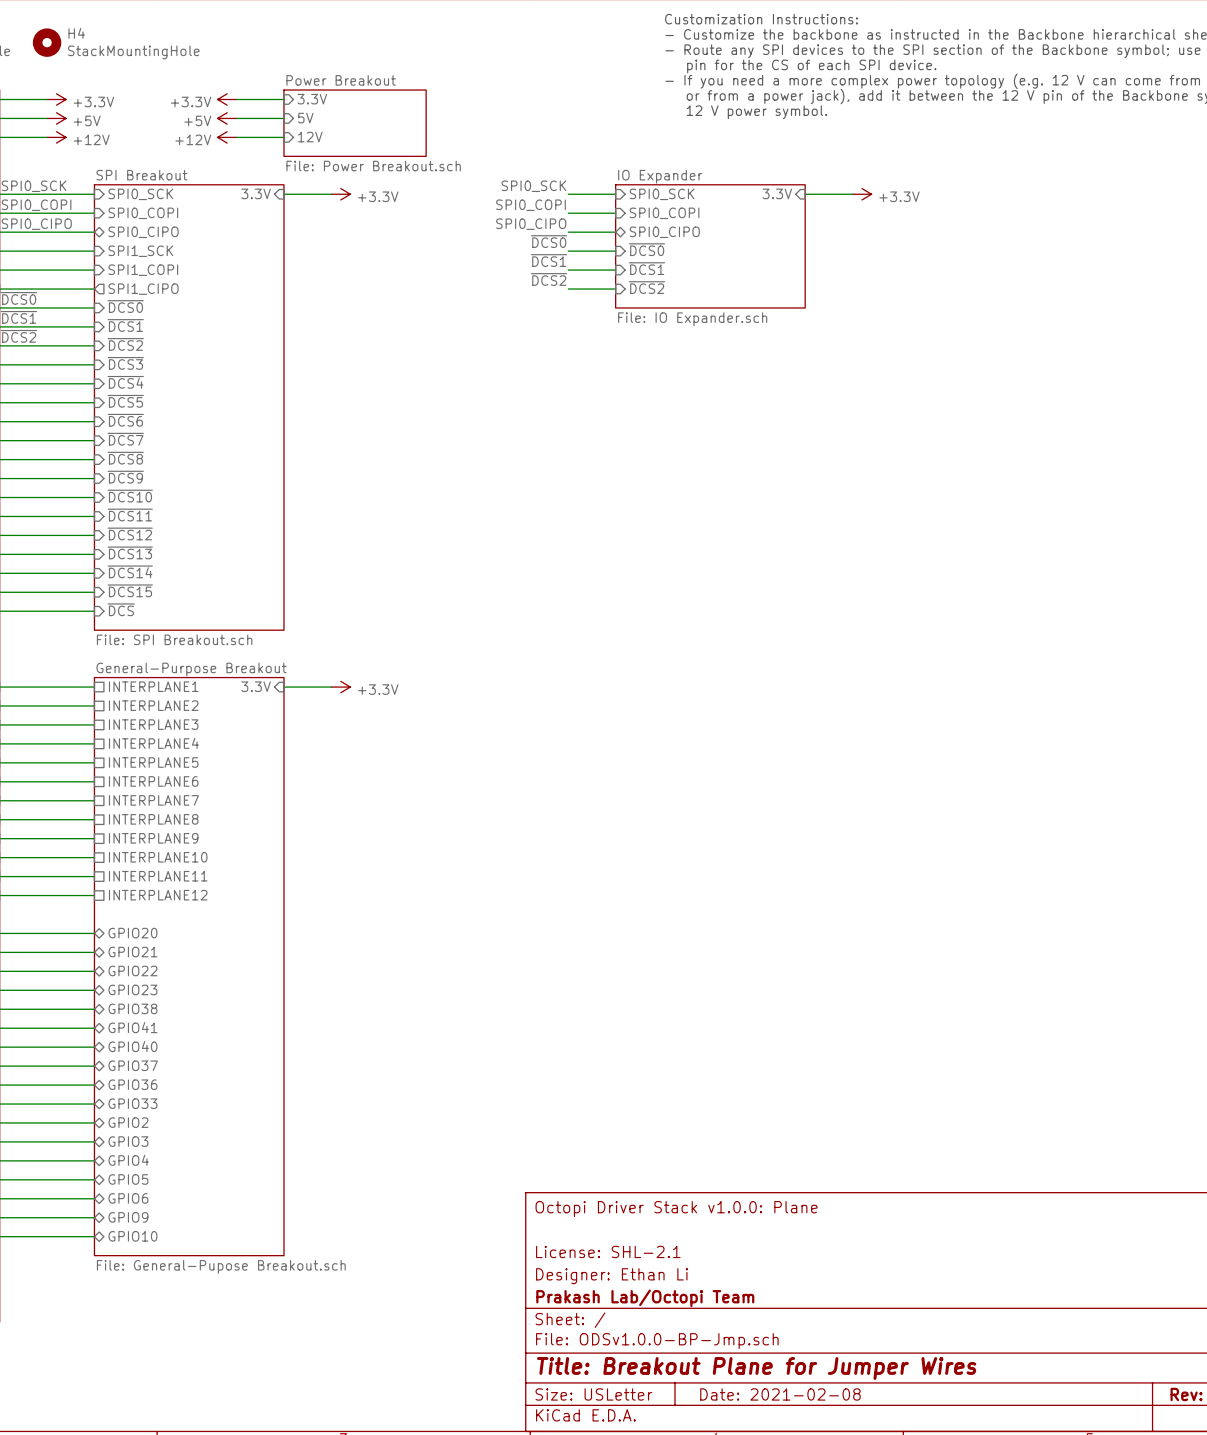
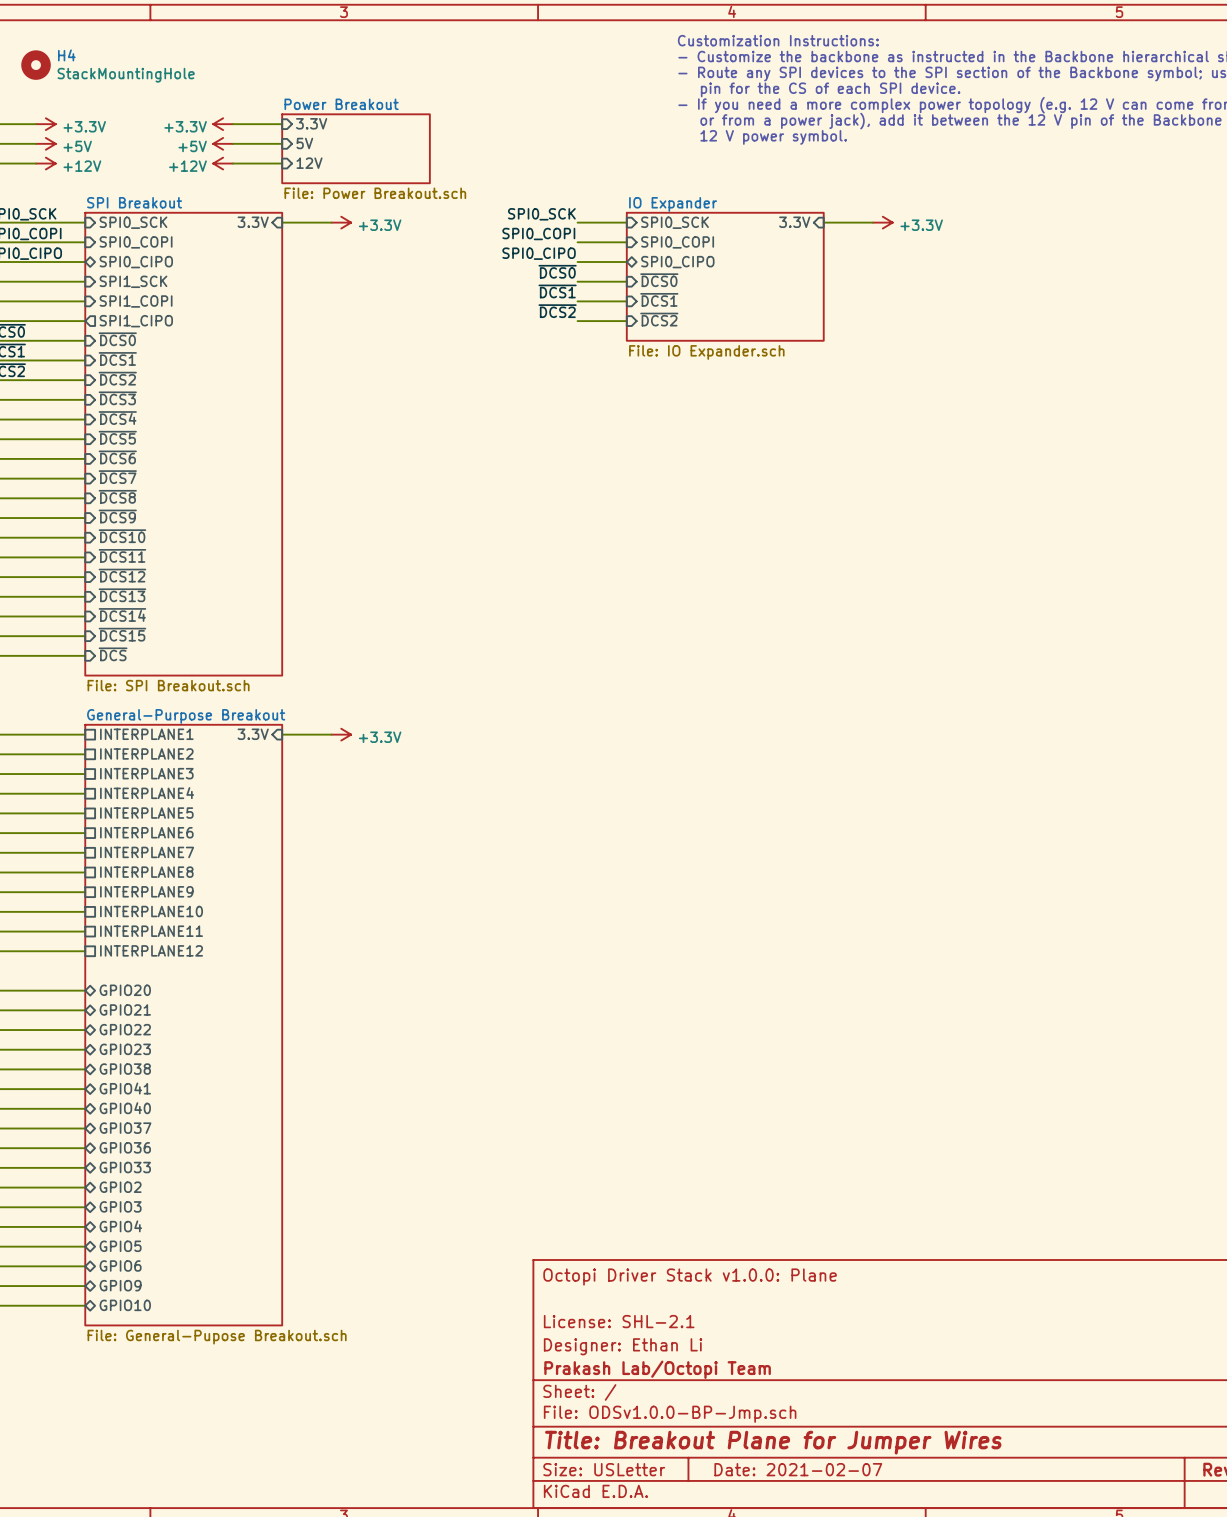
title block: Date: 2021-02-08 (780, 1394) -> Date: 2021-02-07 (798, 1469)

